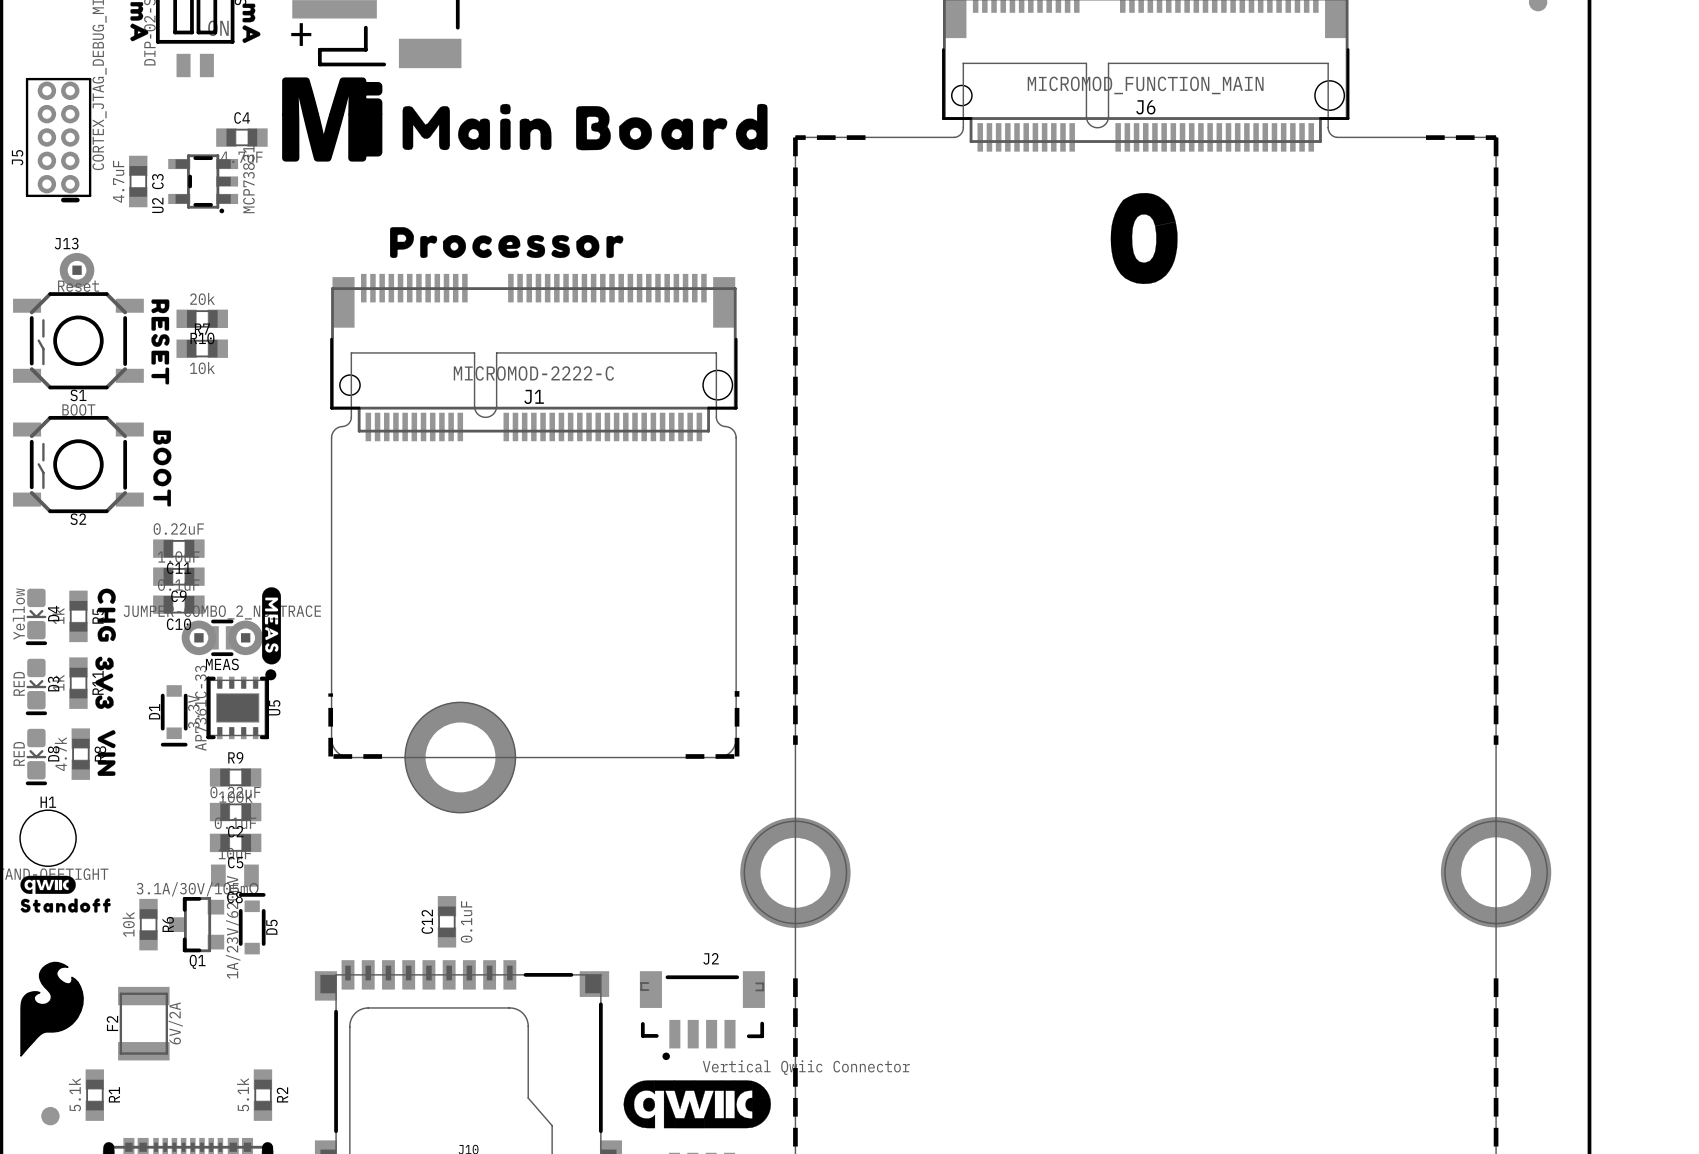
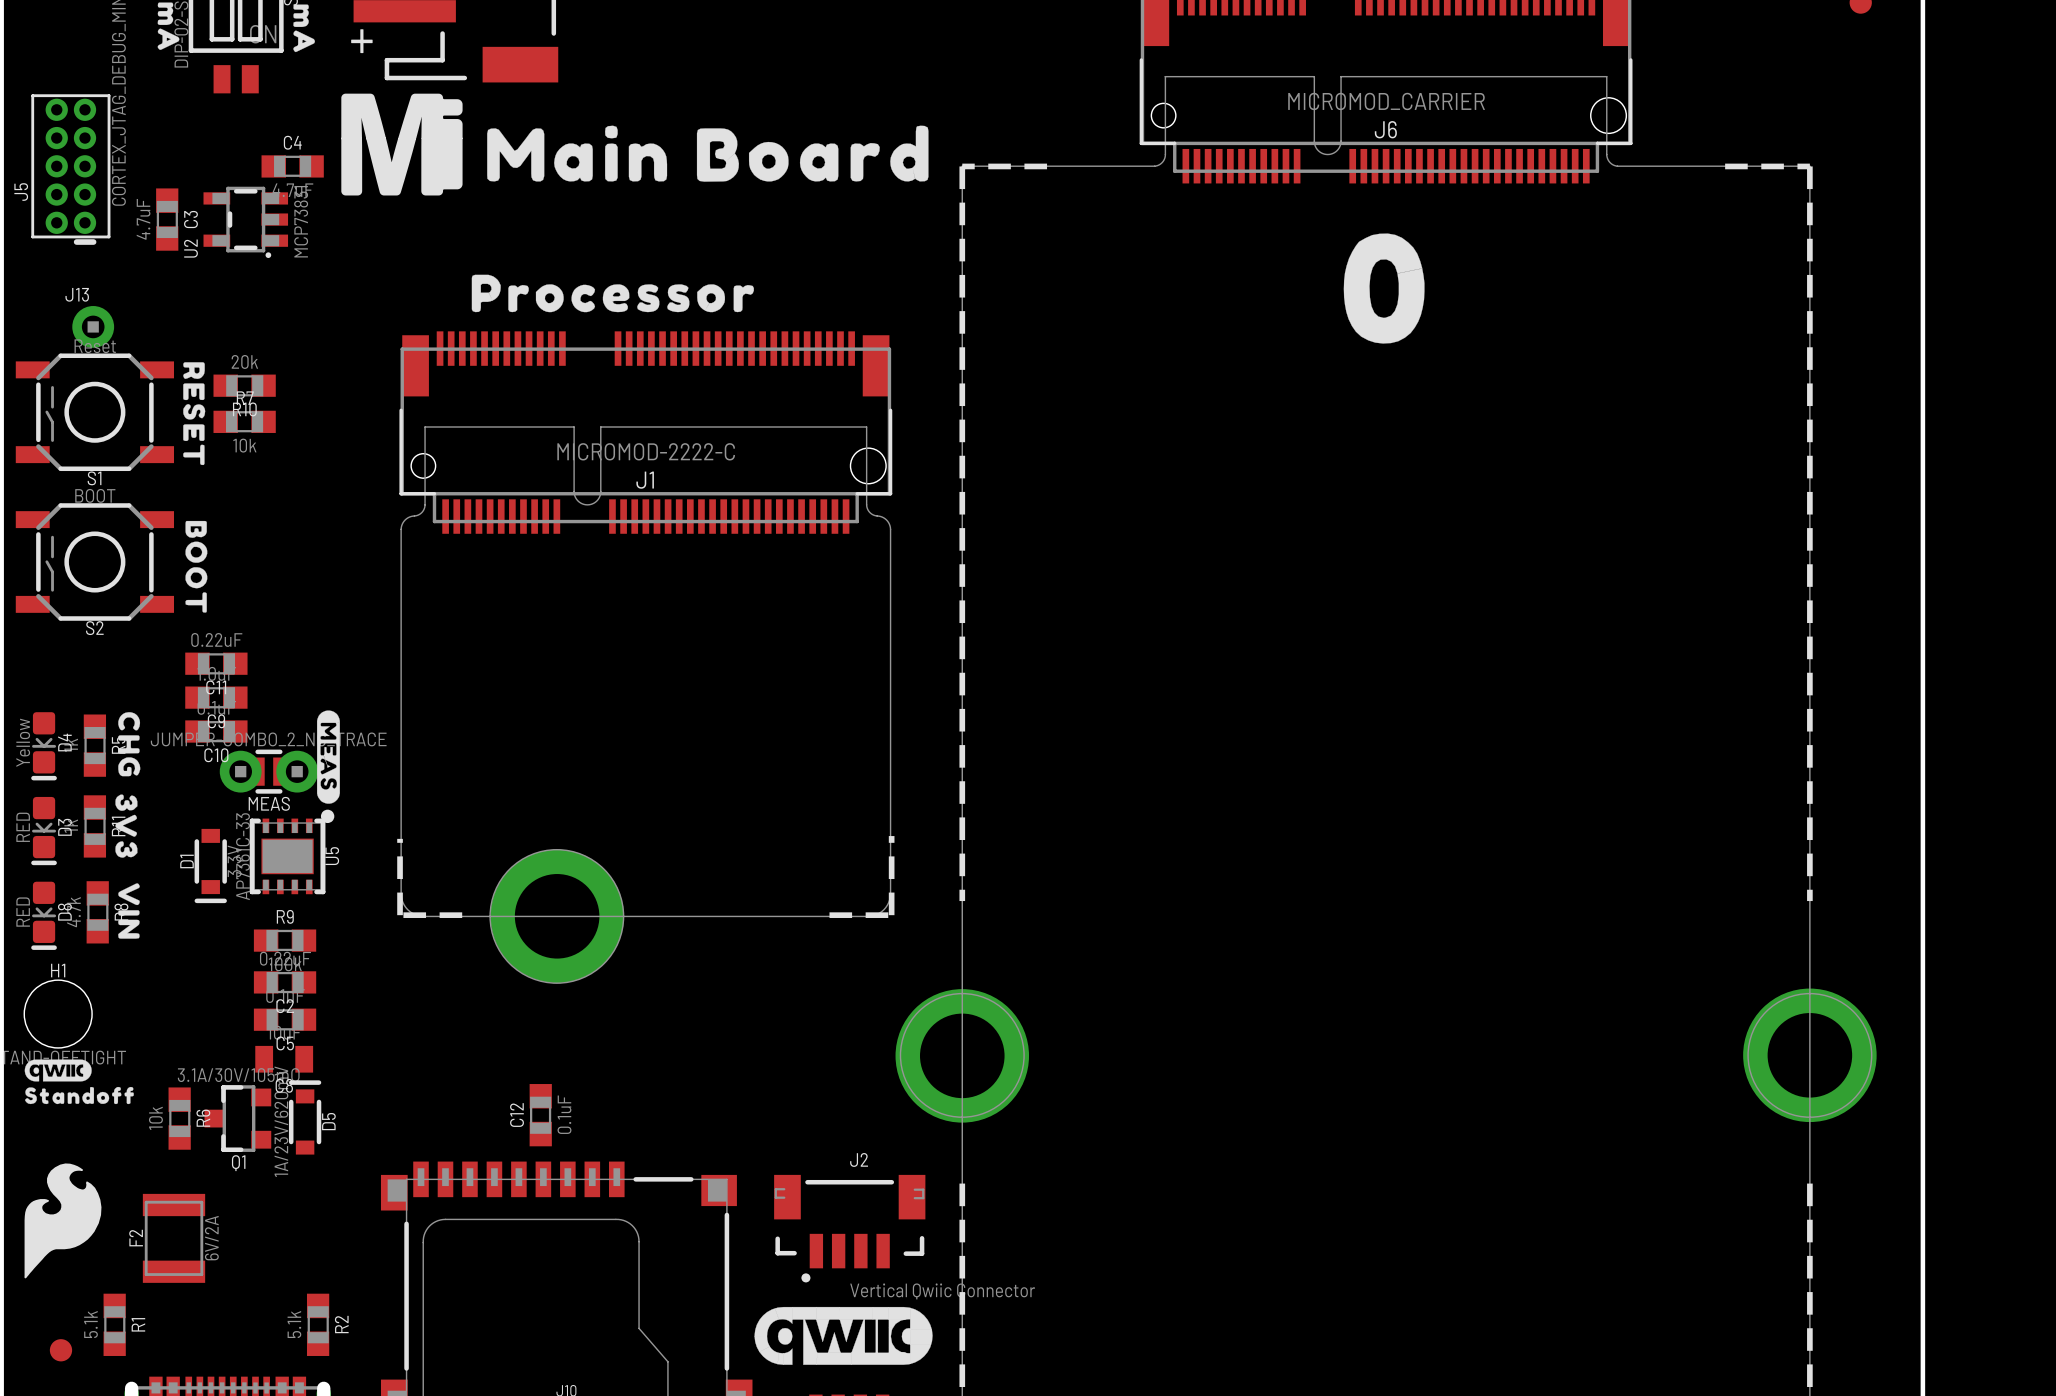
J6 value: MICROMOD_FUNCTION_MAIN (1145, 85) -> MICROMOD_CARRIER (1386, 101)

